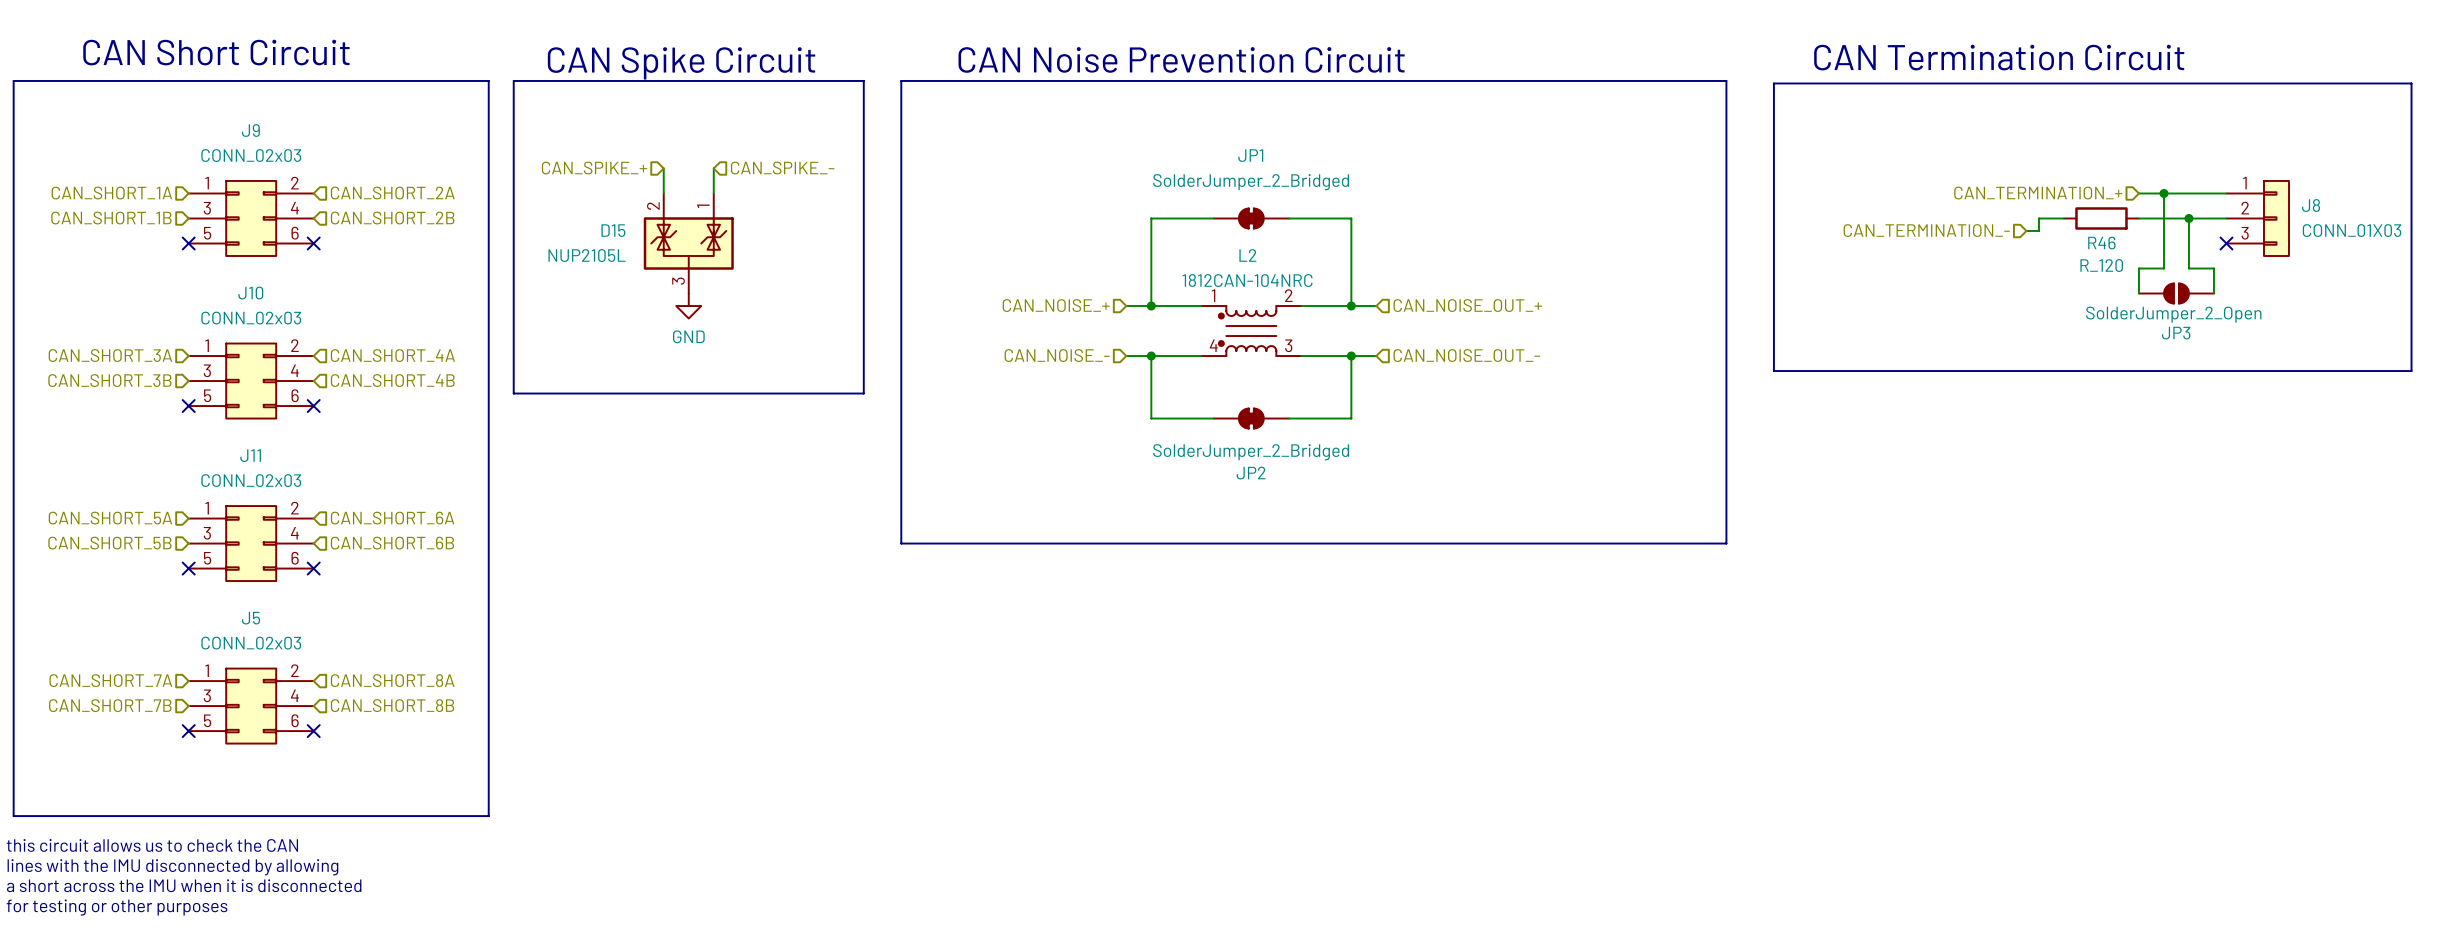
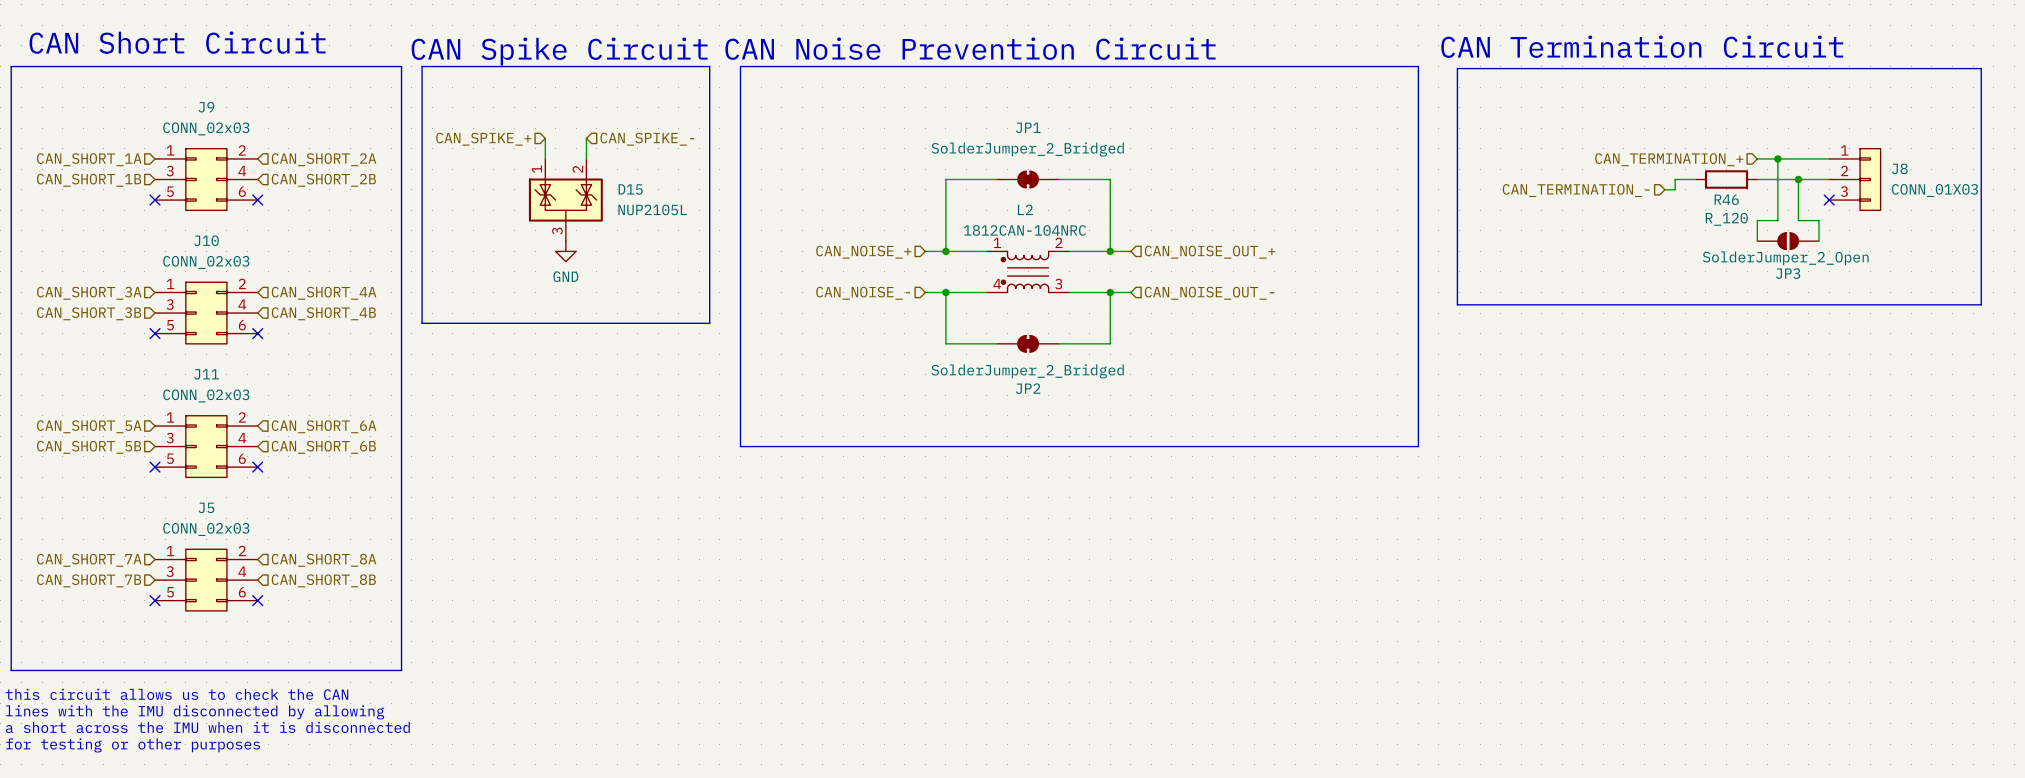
D15 flip: as is (688, 243) -> left-right (565, 200)

